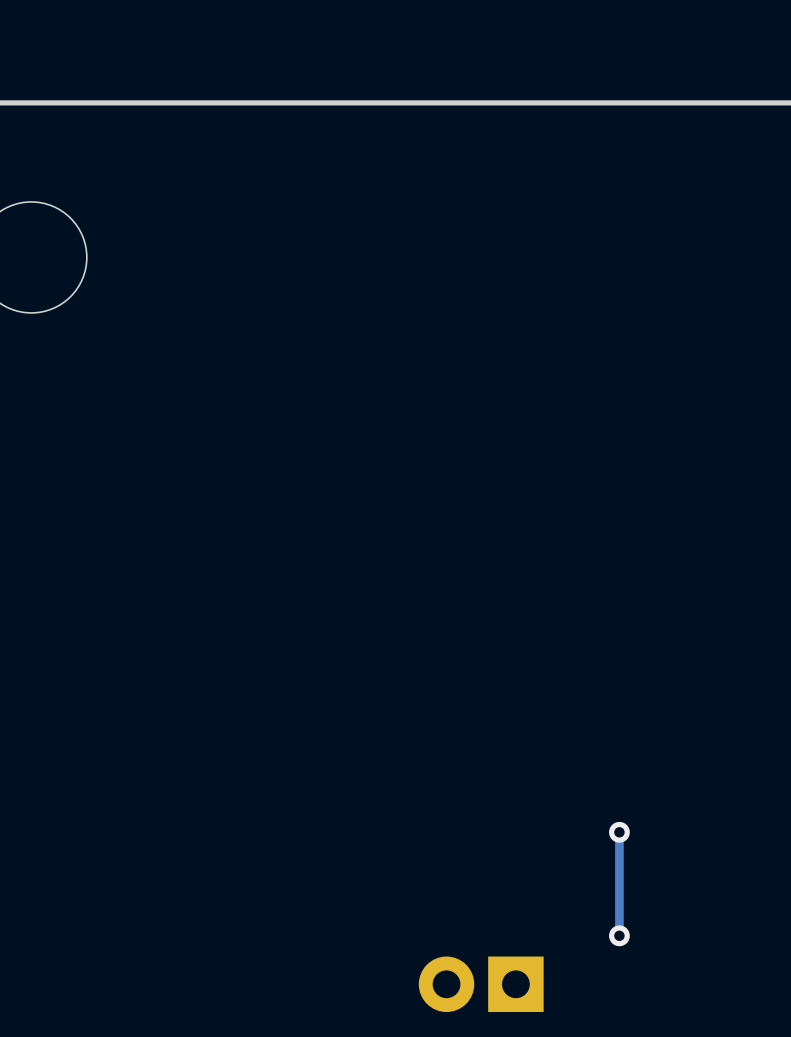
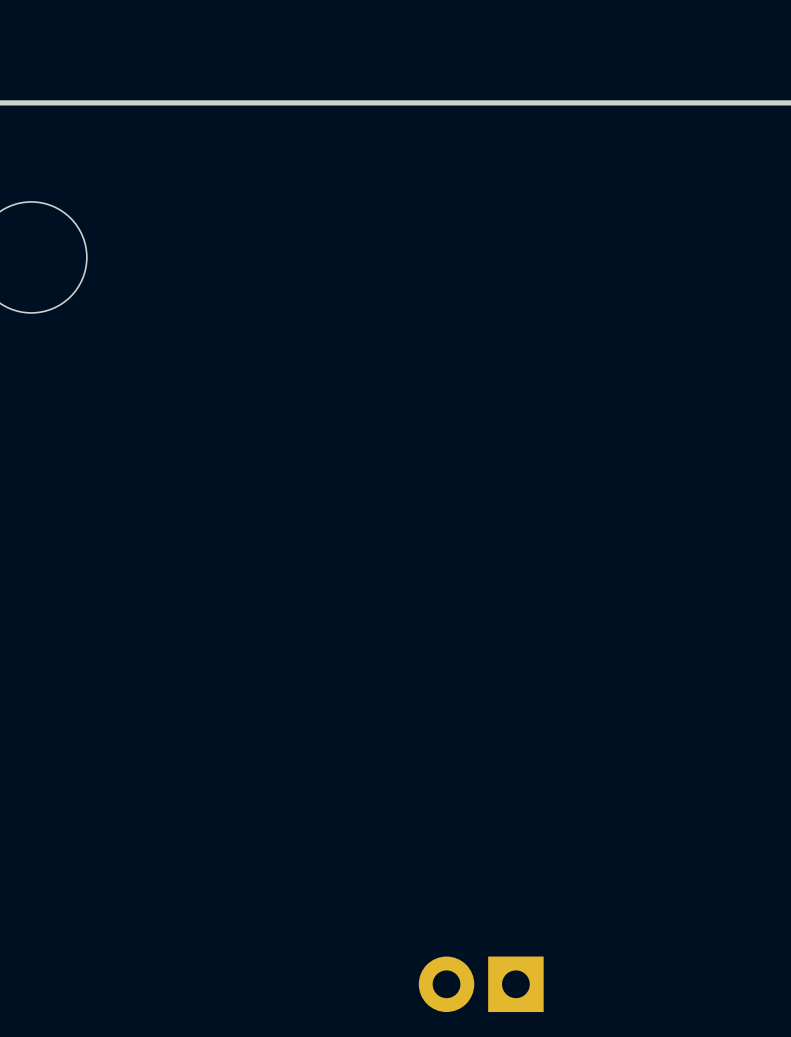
track: (619, 832) (619, 935) -> none
via: (619, 832) -> none
via: (619, 935) -> none

